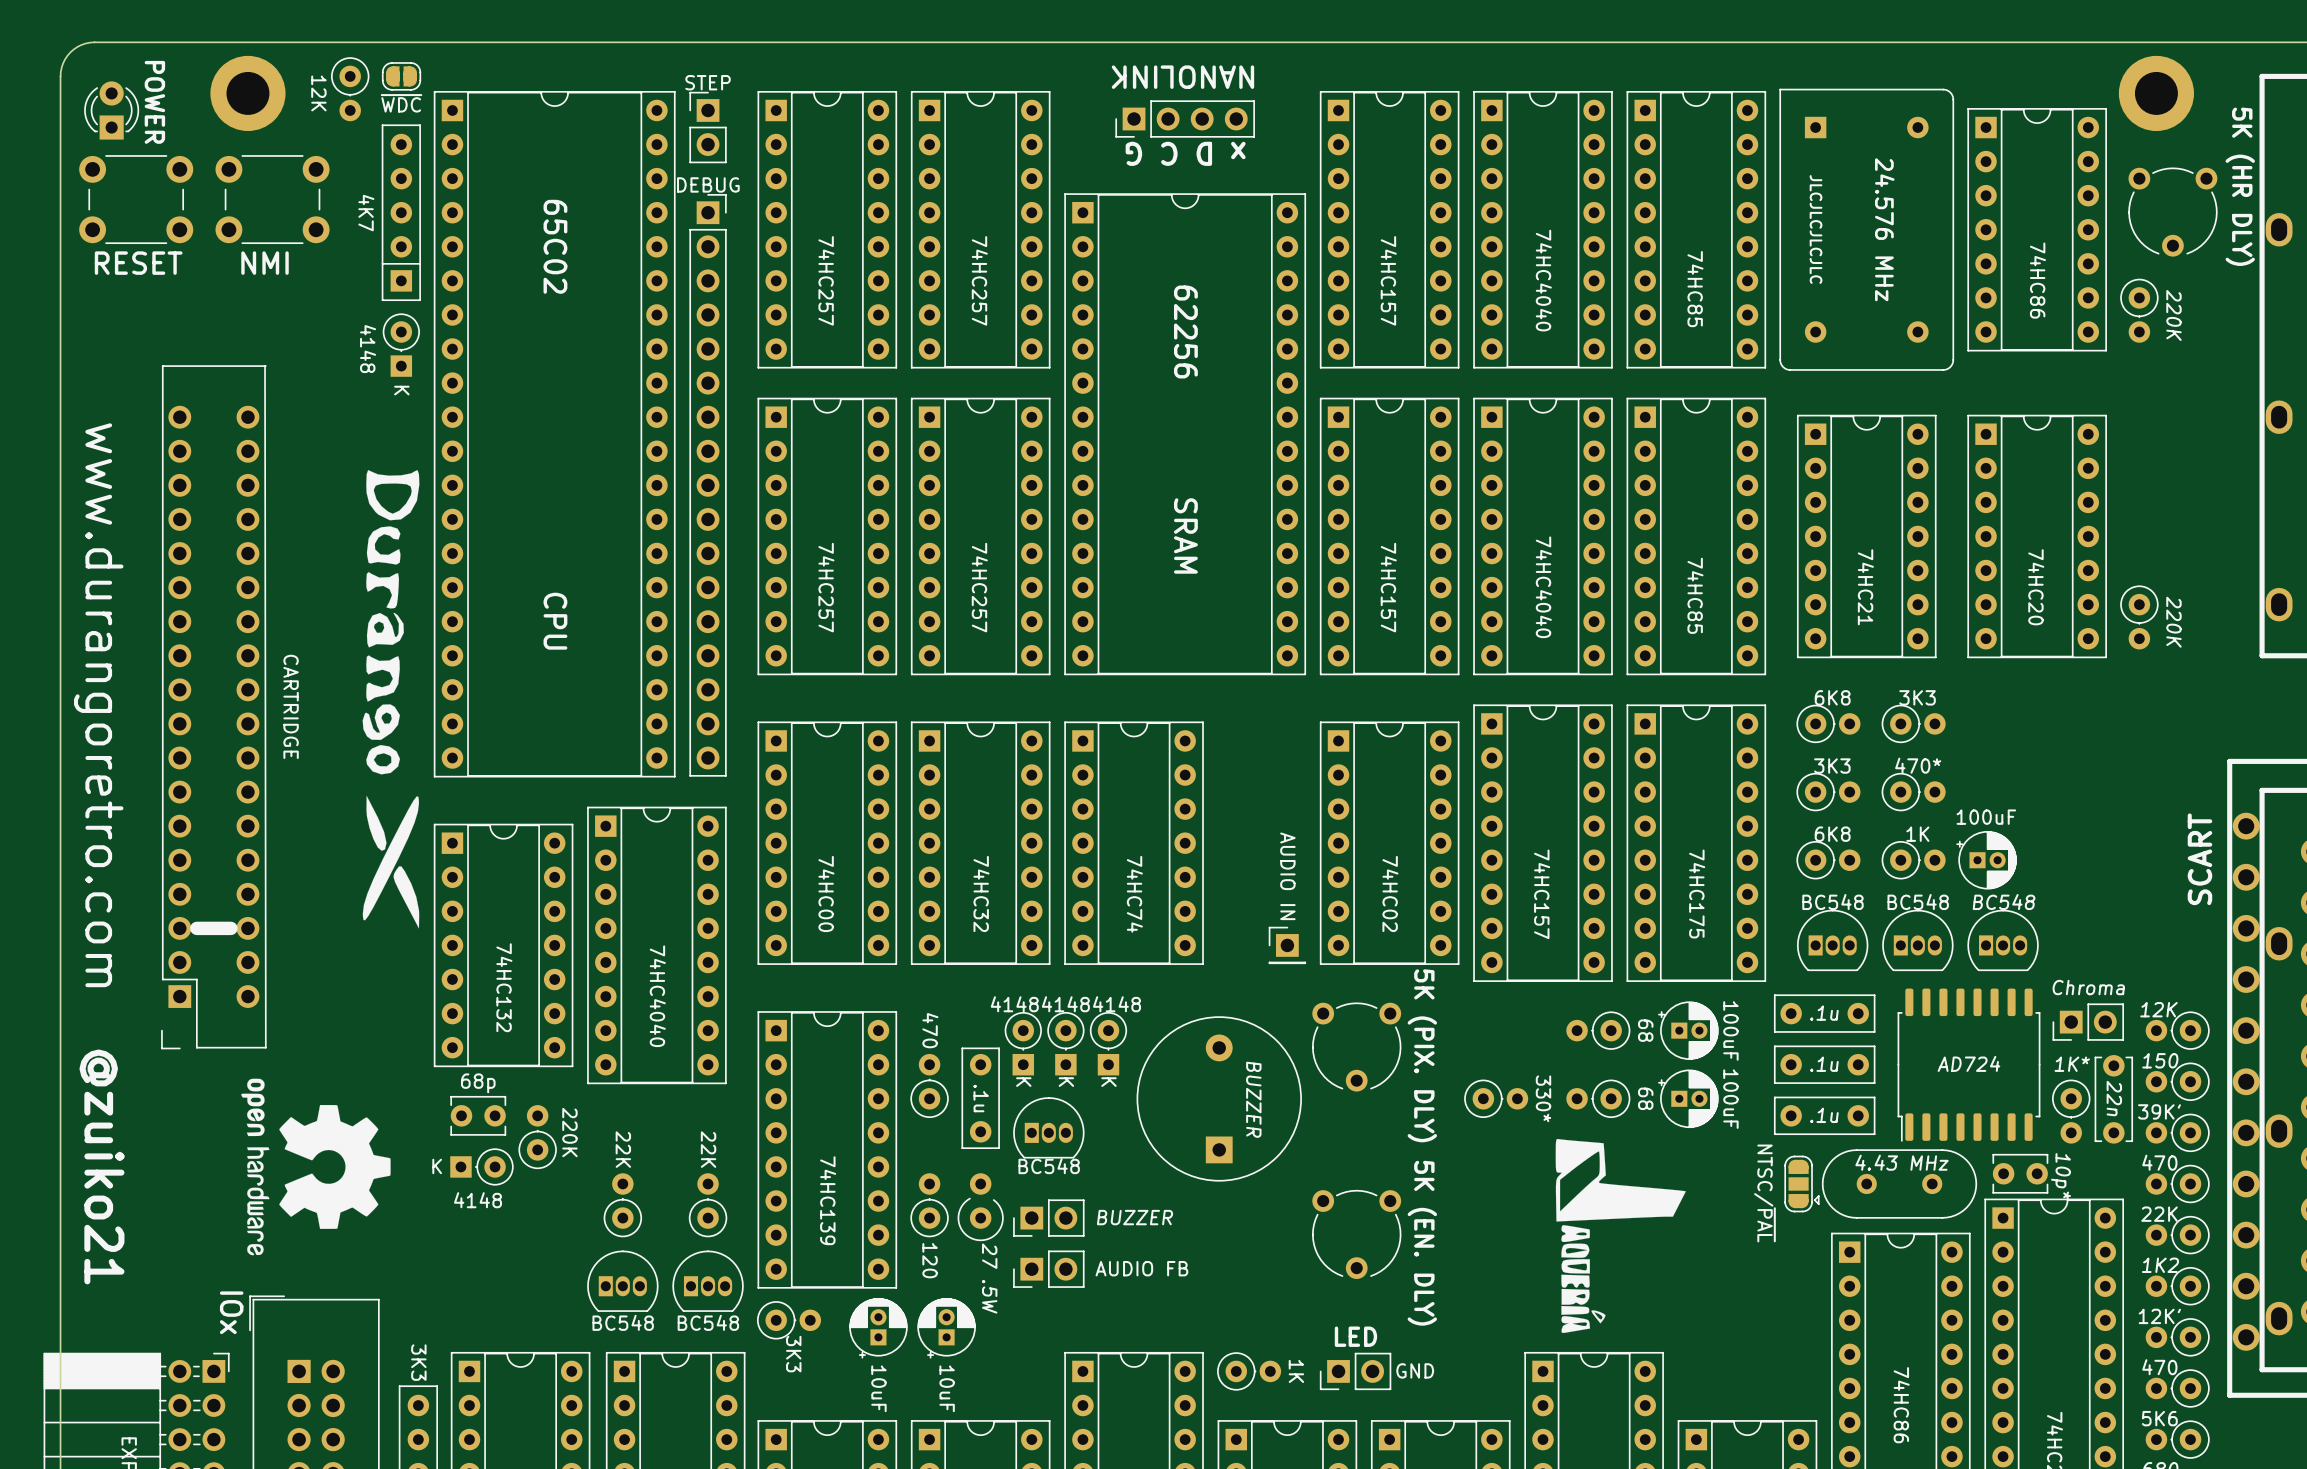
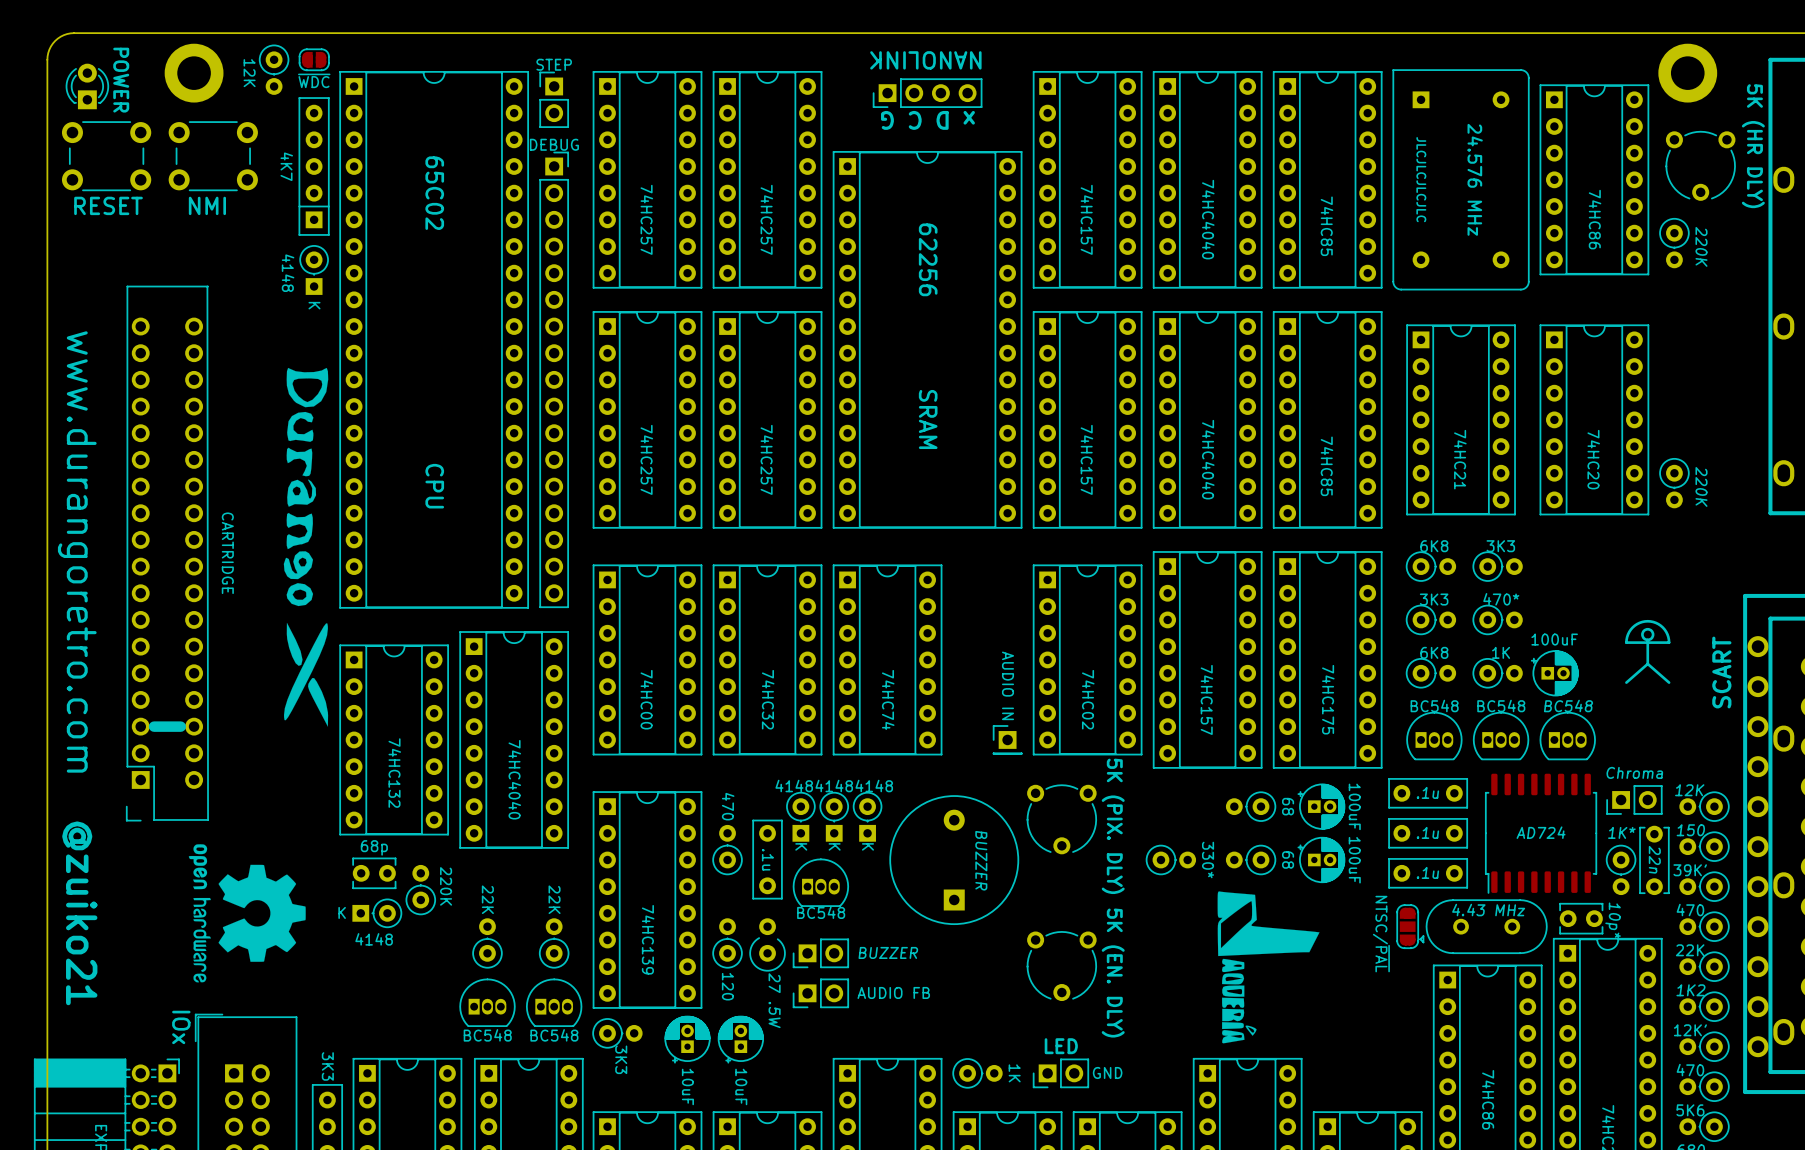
drawing: none -> [1641, 627, 1655, 642]
line: none -> (1647, 639) (1647, 663)
line: none -> (1626, 642) (1669, 642) (1667, 634) (1662, 627) (1655, 622) (1647, 621) (1639, 622) (1632, 627) (1628, 634) (1626, 642)
line: none -> (1647, 663) (1669, 682)
line: none -> (1647, 663) (1626, 682)

